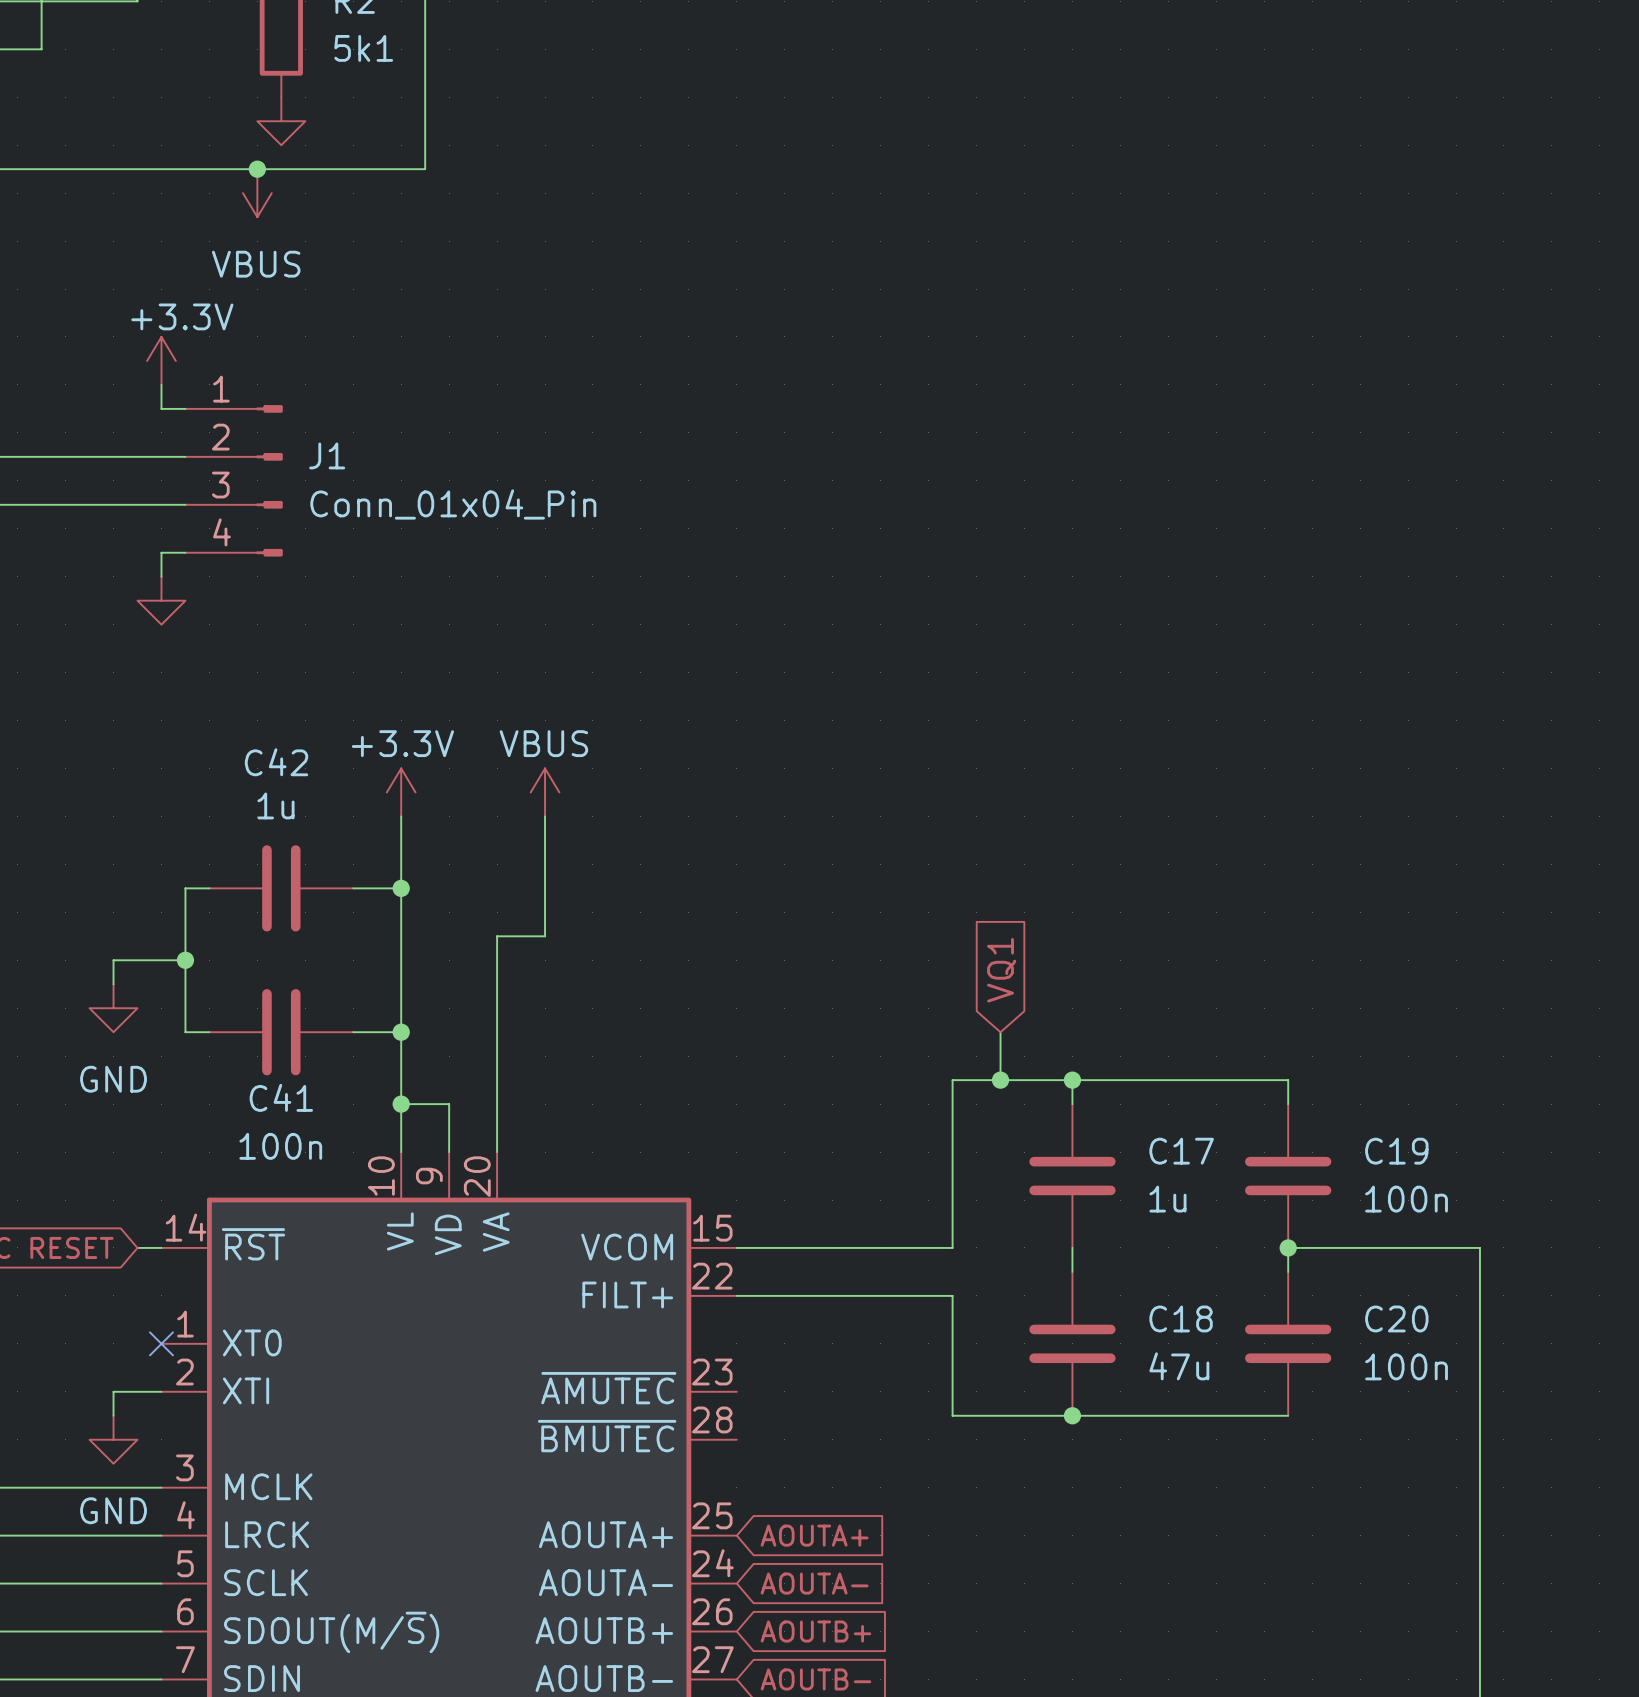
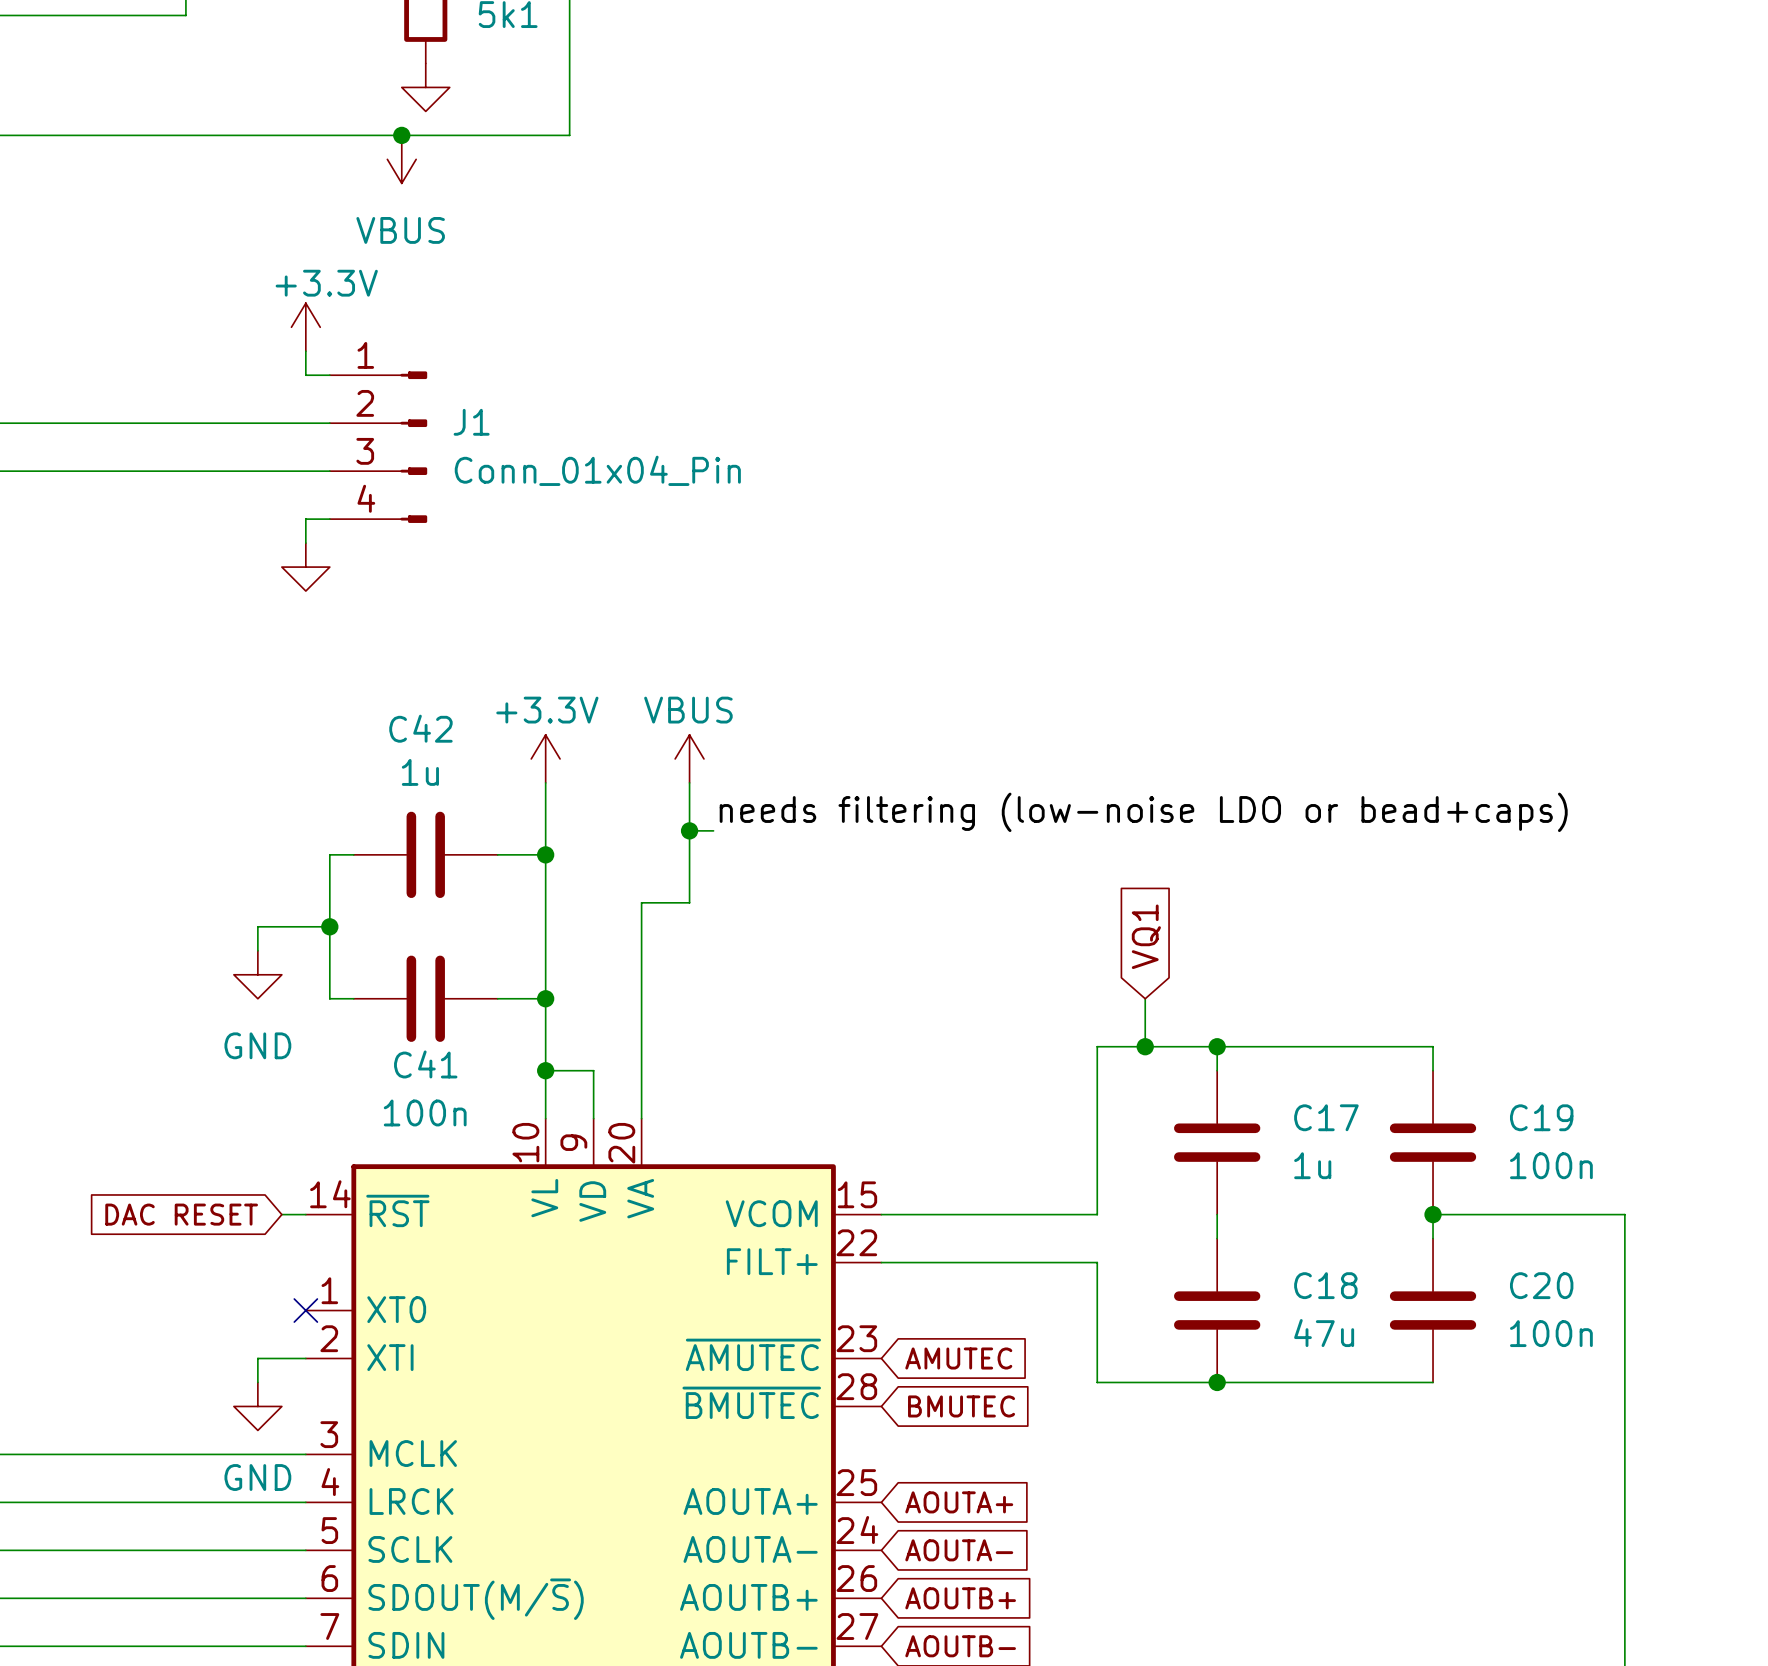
label: none -> needs filtering (low-noise LDO or bead+caps) (1143, 812)
wire: none -> (689, 830) (713, 830)
junction: none -> (689, 830)
global label: none -> AMUTEC (958, 1358)
global label: none -> BMUTEC (961, 1406)

